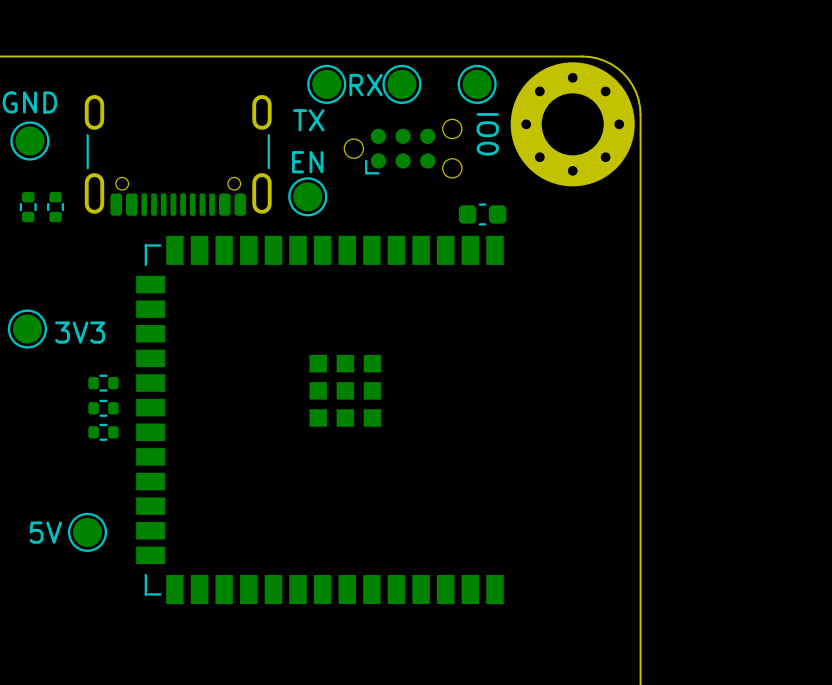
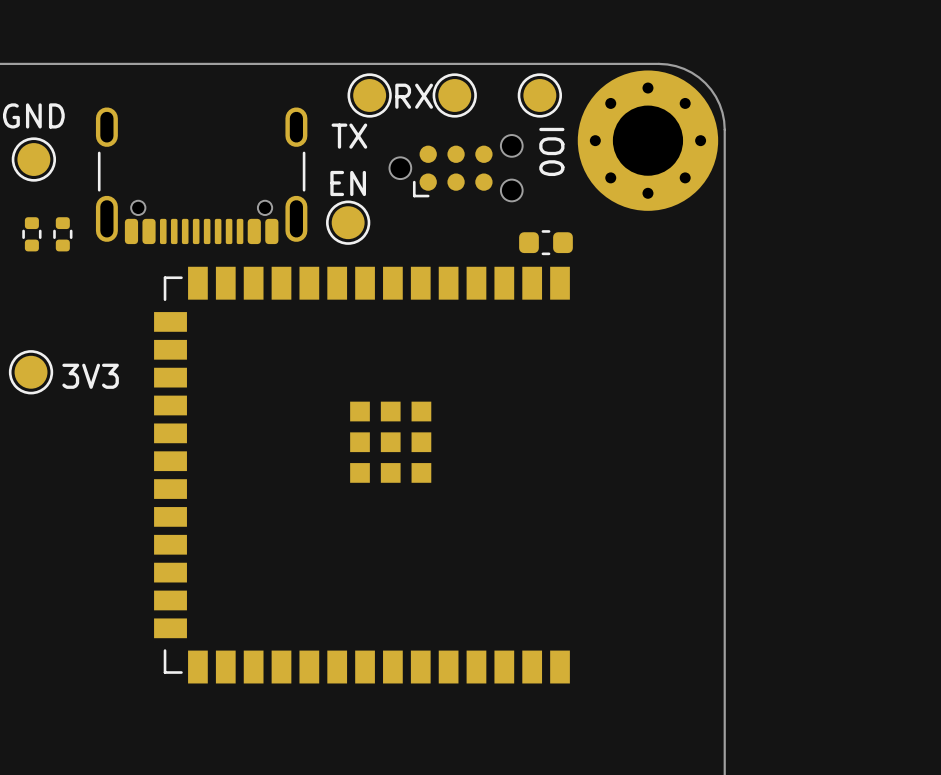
part: (103, 383) -> none
part: (103, 408) -> none
part: (103, 432) -> none
part: 5V (87, 532) -> none

